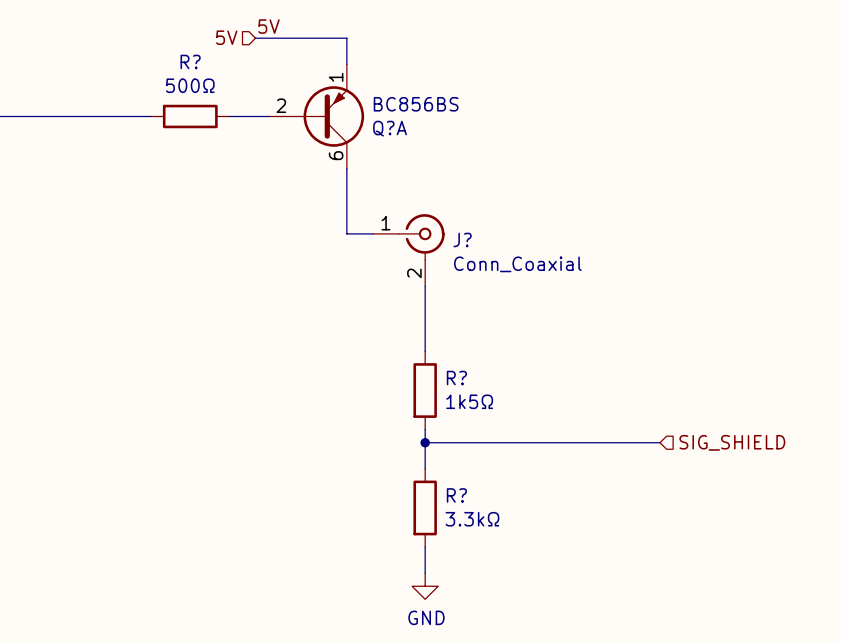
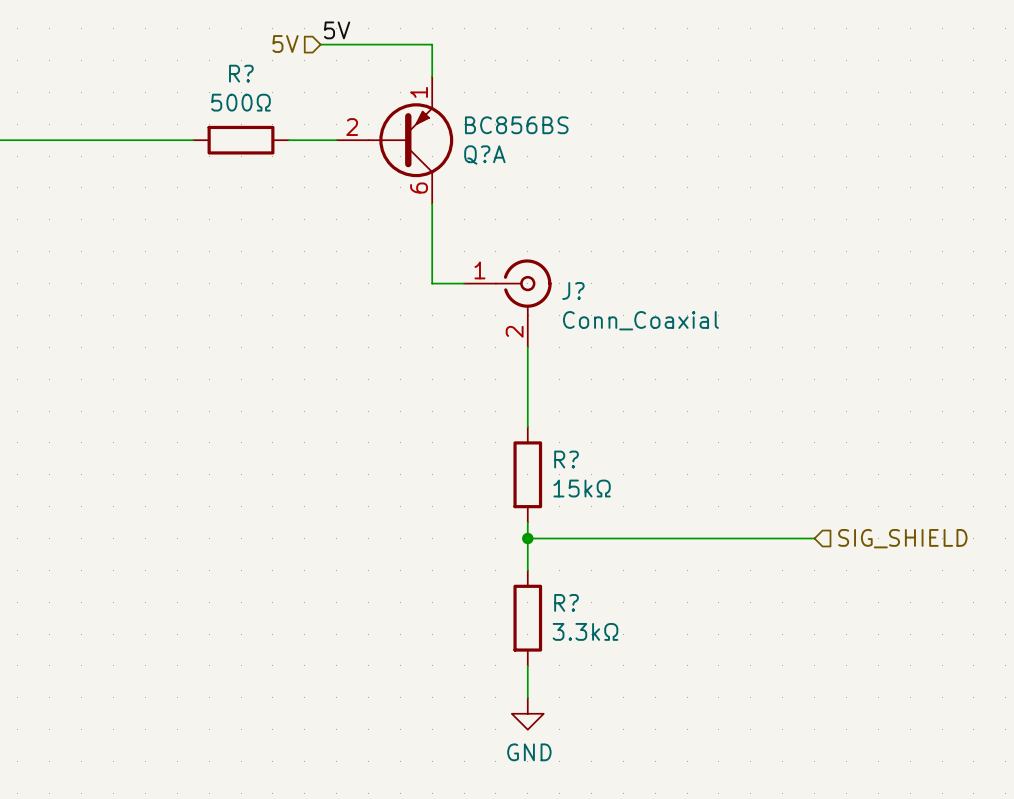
R? value: 1k5Ω (469, 401) -> 15kΩ (582, 488)

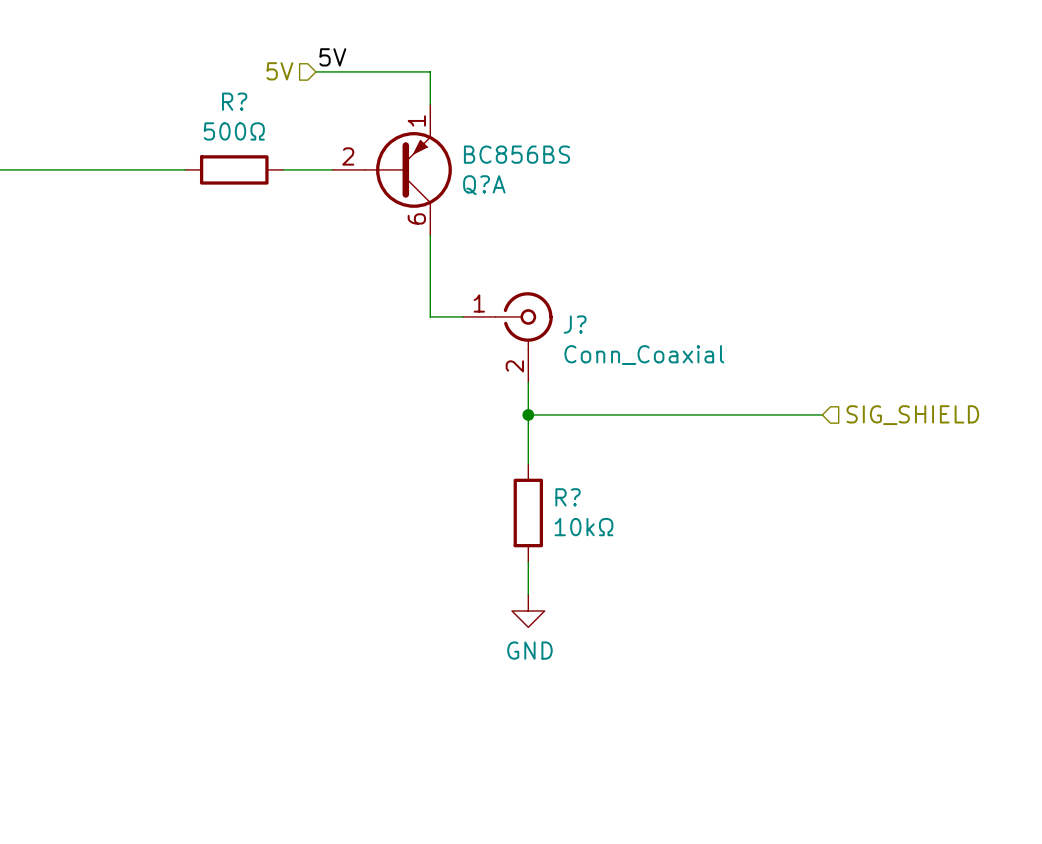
junction: none -> (528, 414)
R? value: 15kΩ (582, 488) -> 10kΩ (583, 527)
wire: (527, 538) (814, 538) -> (528, 414) (822, 414)
junction: (527, 538) -> none
hierarchical label position: SIG_SHIELD (902, 538) -> SIG_SHIELD (912, 415)
R?: 3.3kΩ (527, 618) -> none
wire: (527, 665) (527, 697) -> none
power symbol position: GND (527, 713) -> GND (528, 611)

